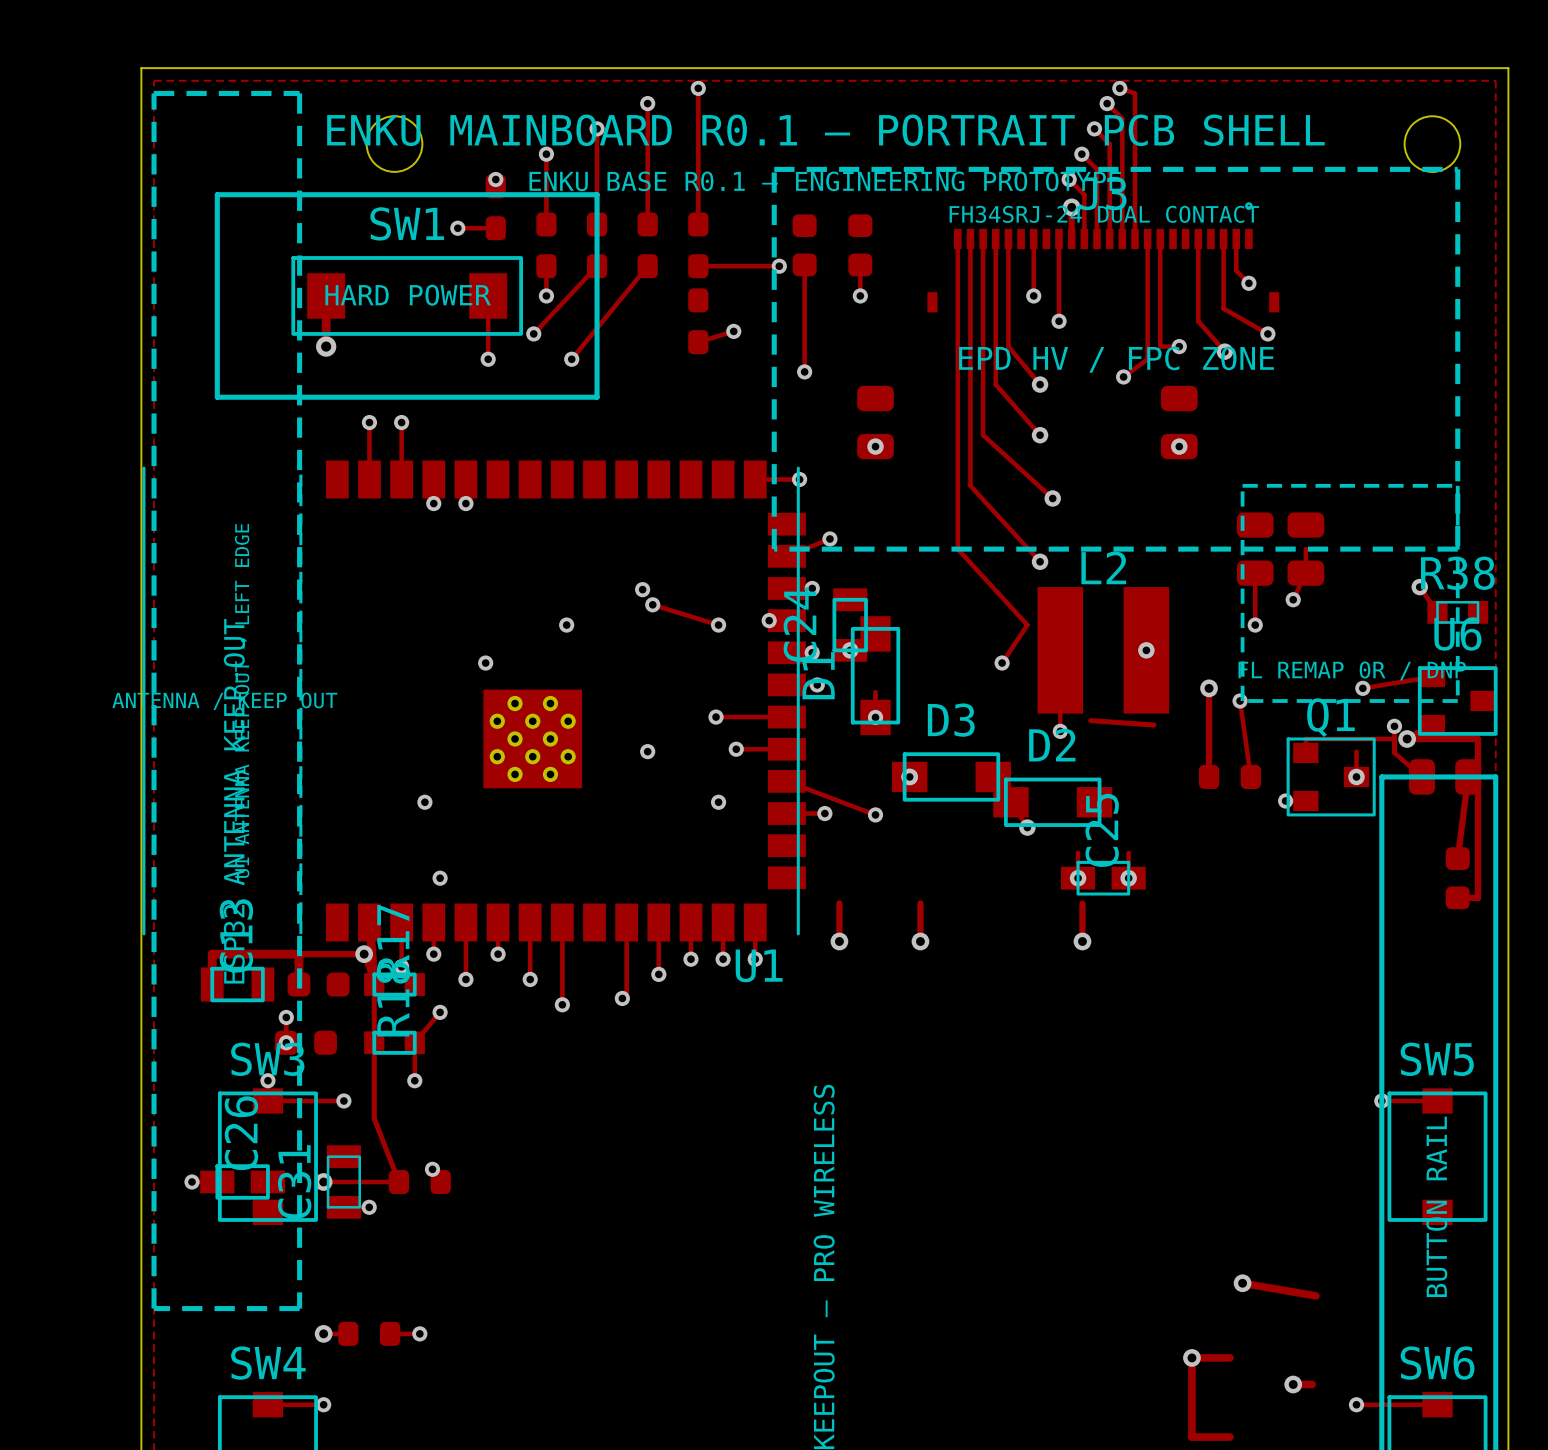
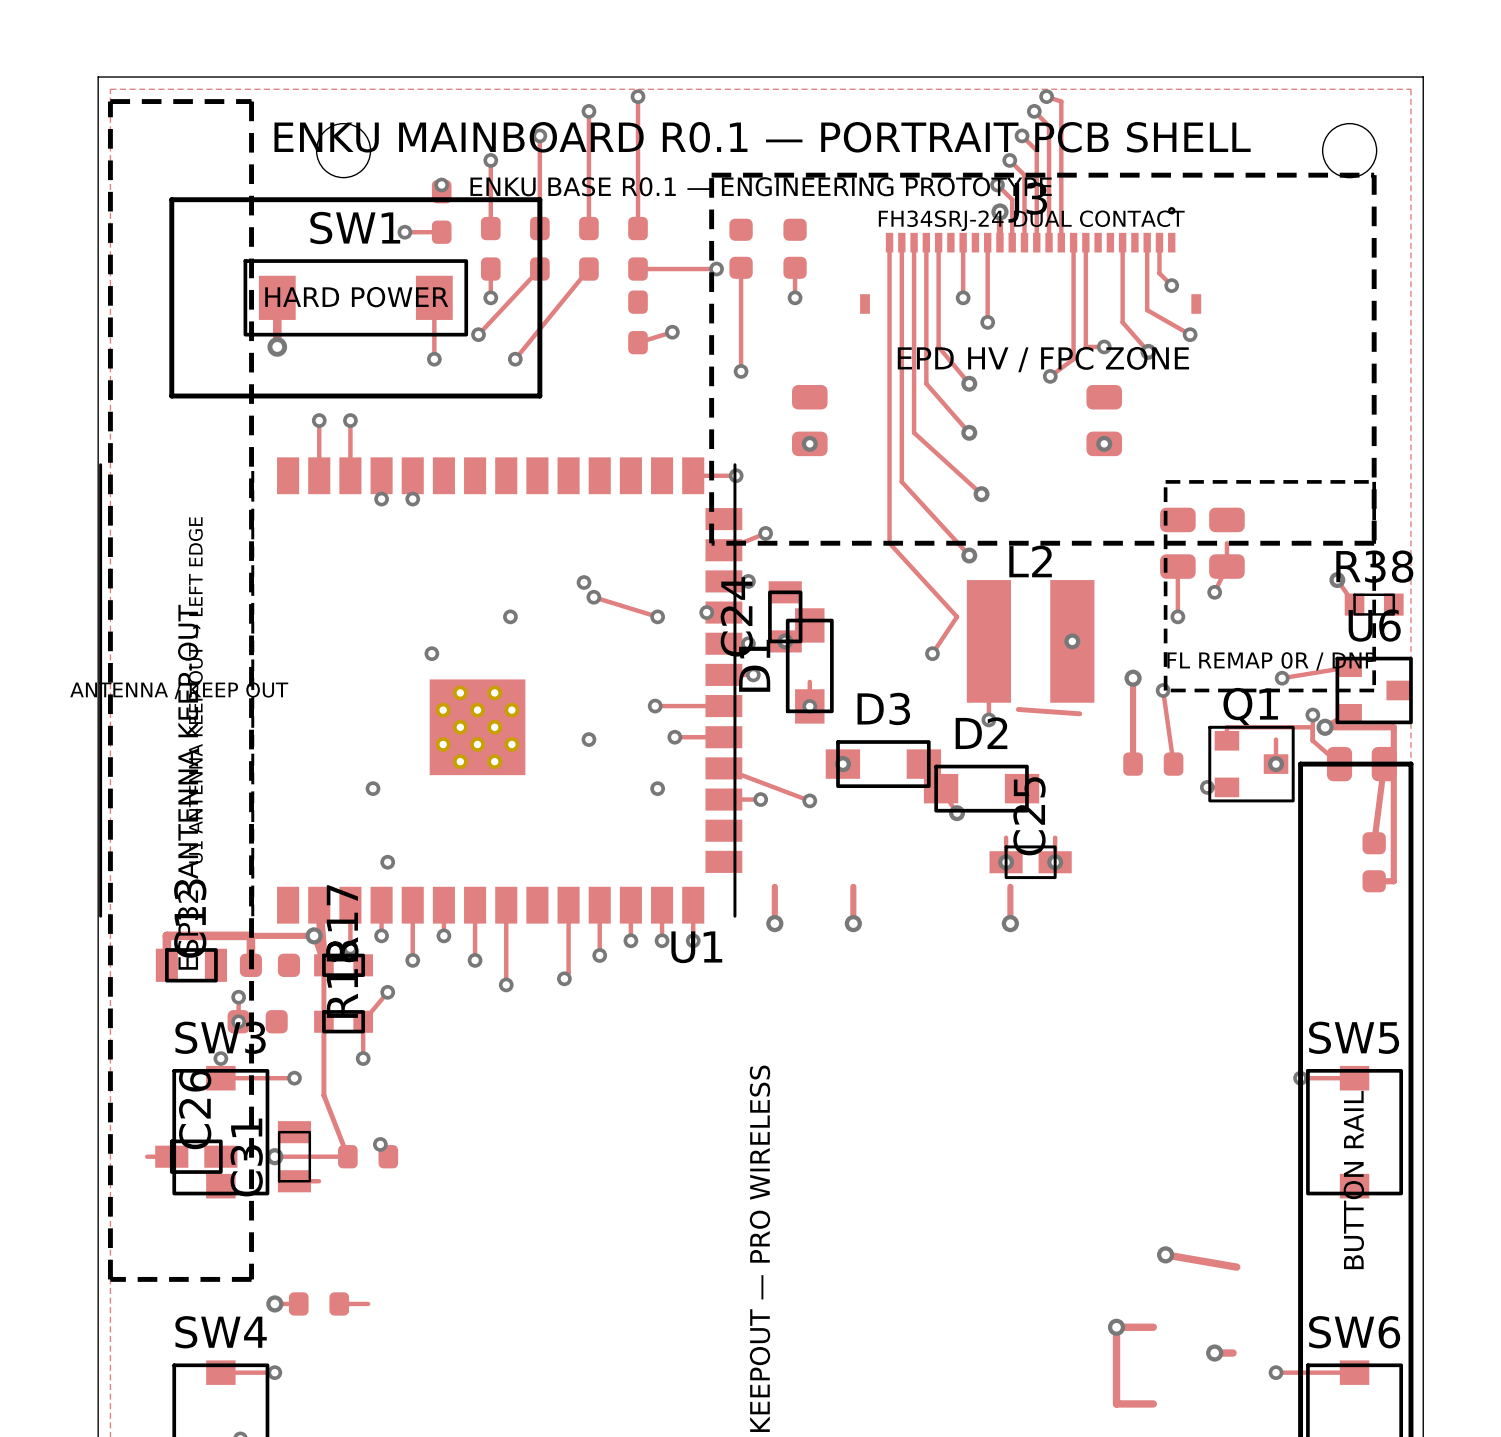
via: (192, 1181) -> none
via: (369, 1207) -> none
via: (419, 1333) -> none

